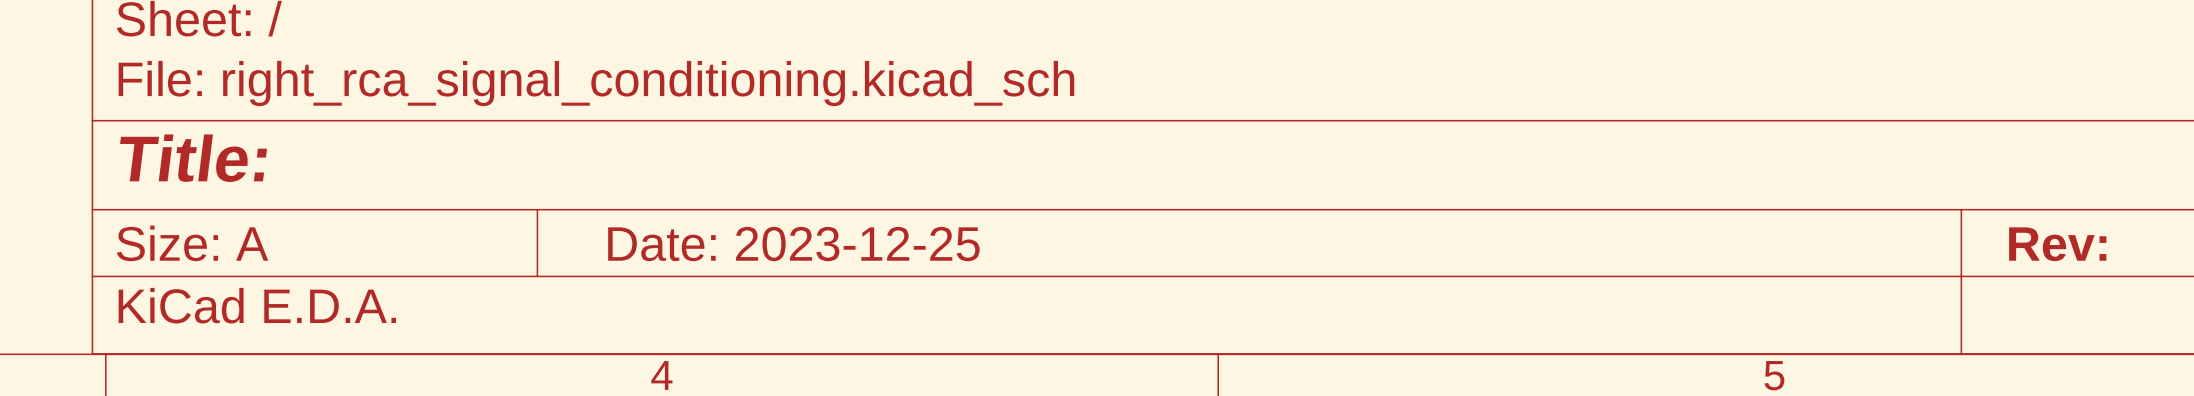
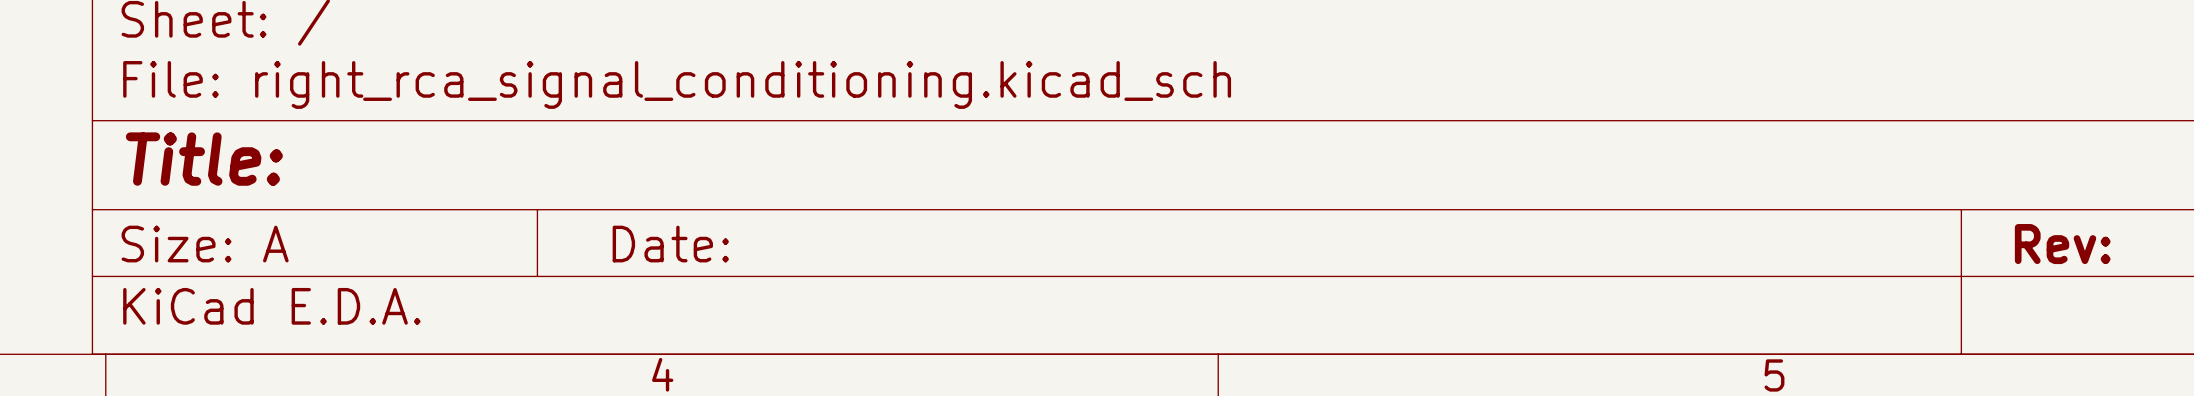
title block: Date: 2023-12-25 (793, 244) -> Date: (670, 244)

